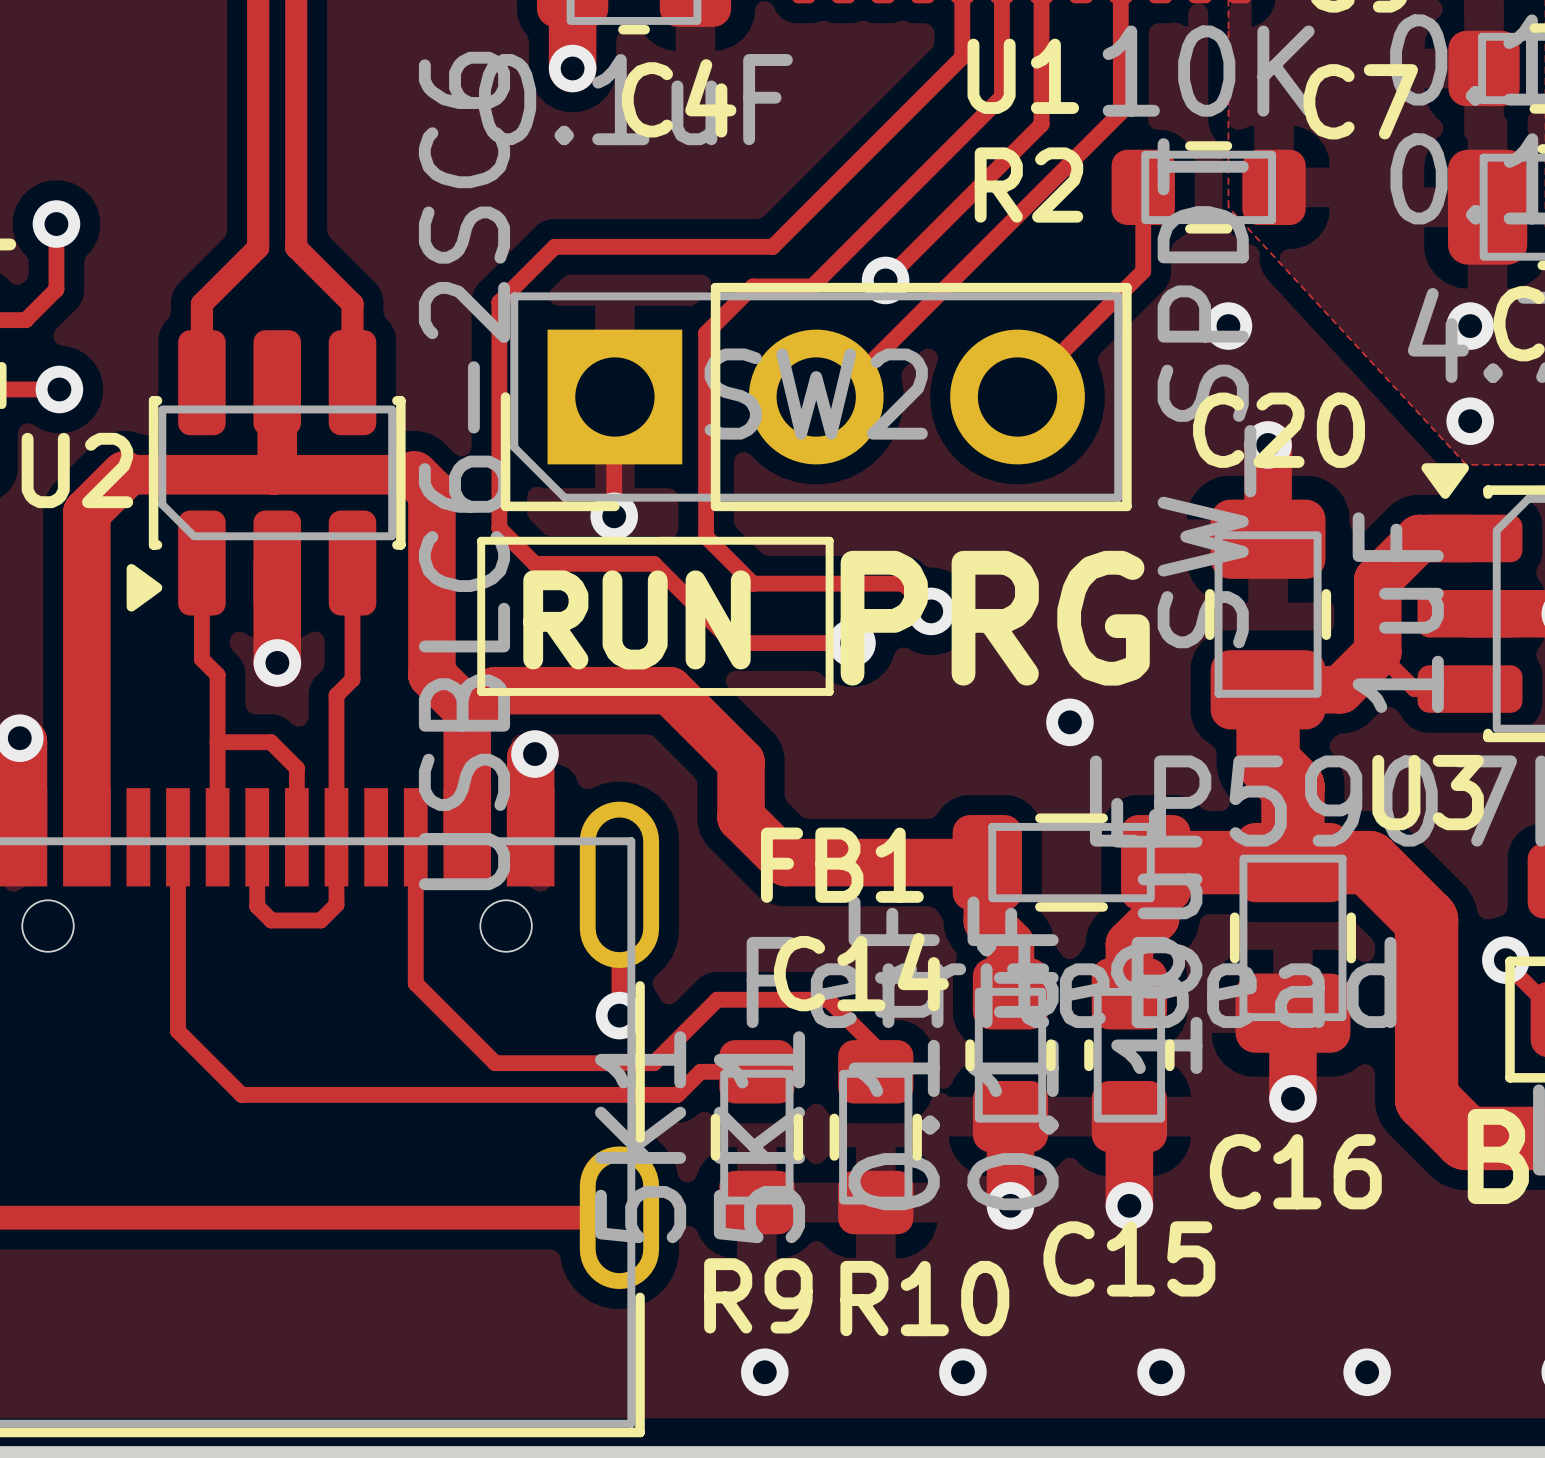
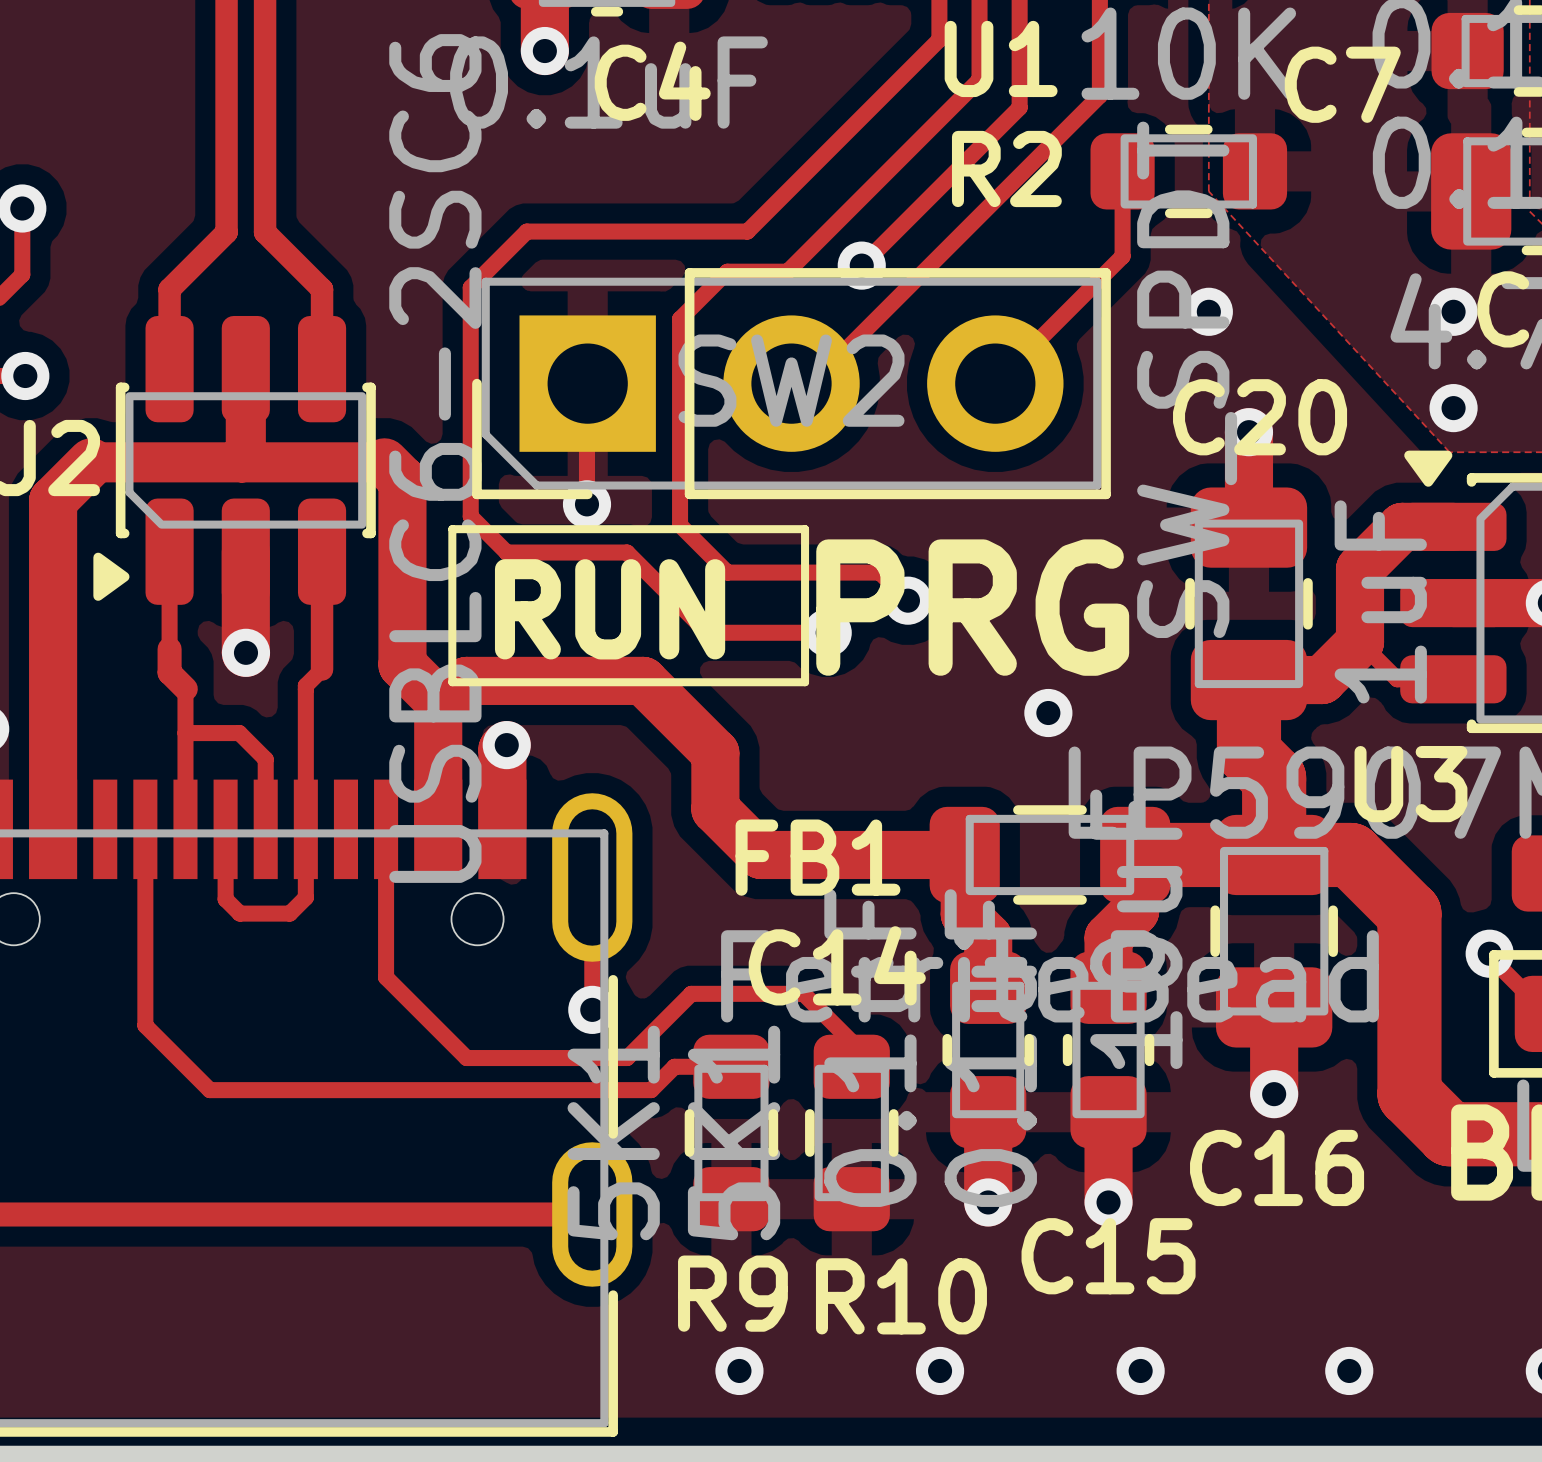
track width: thin (352, 563) (352, 679) -> thick (322, 551) (322, 669)
track: (201, 659) (217, 674) (217, 698) -> (169, 649) (169, 672) (185, 688)

